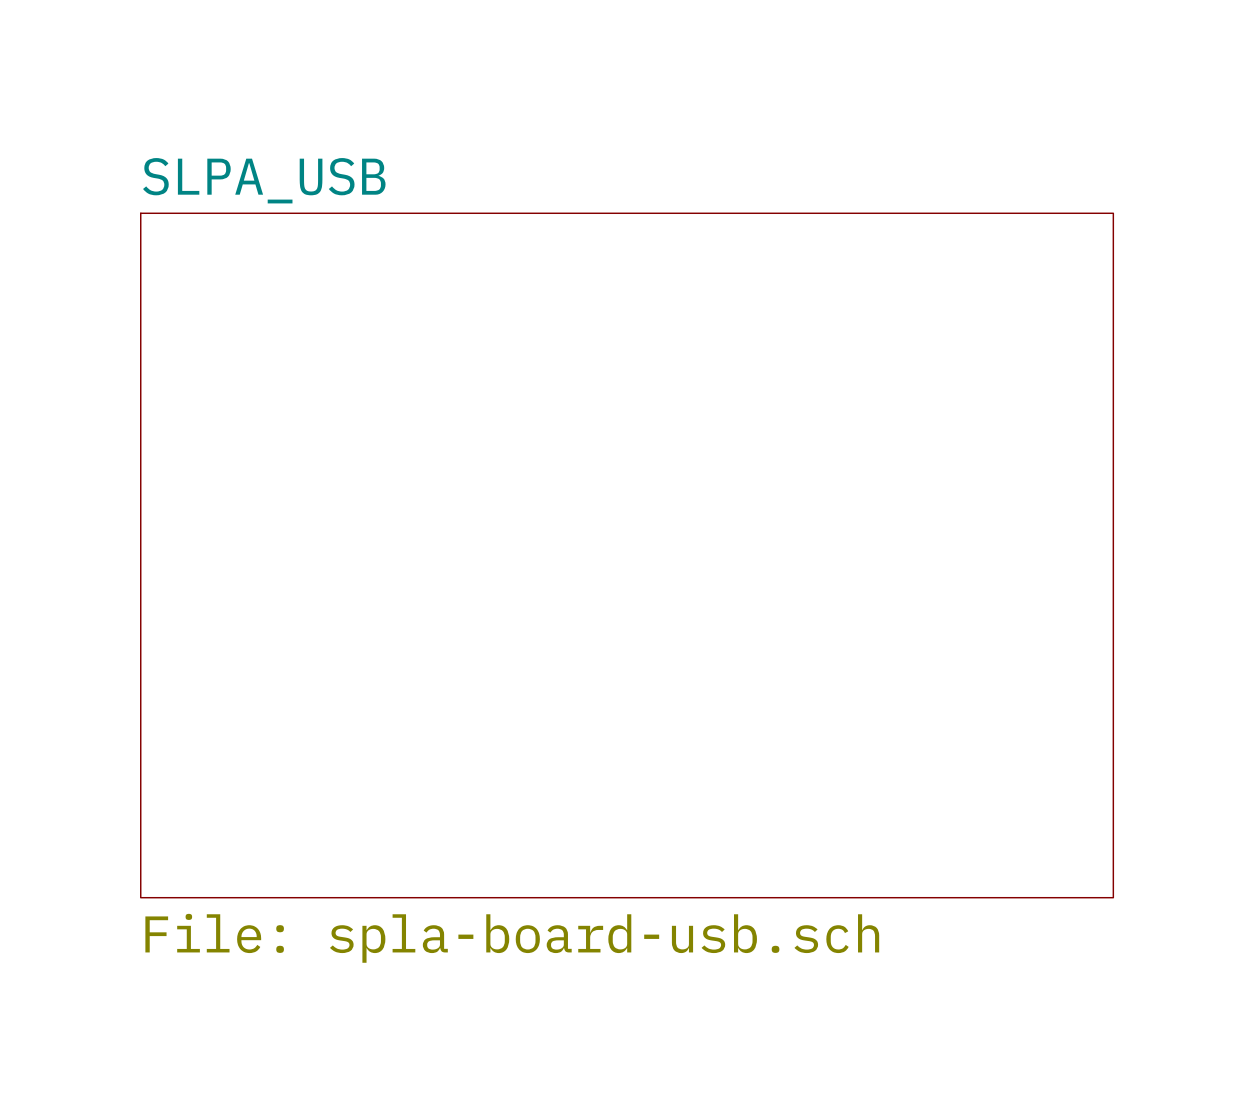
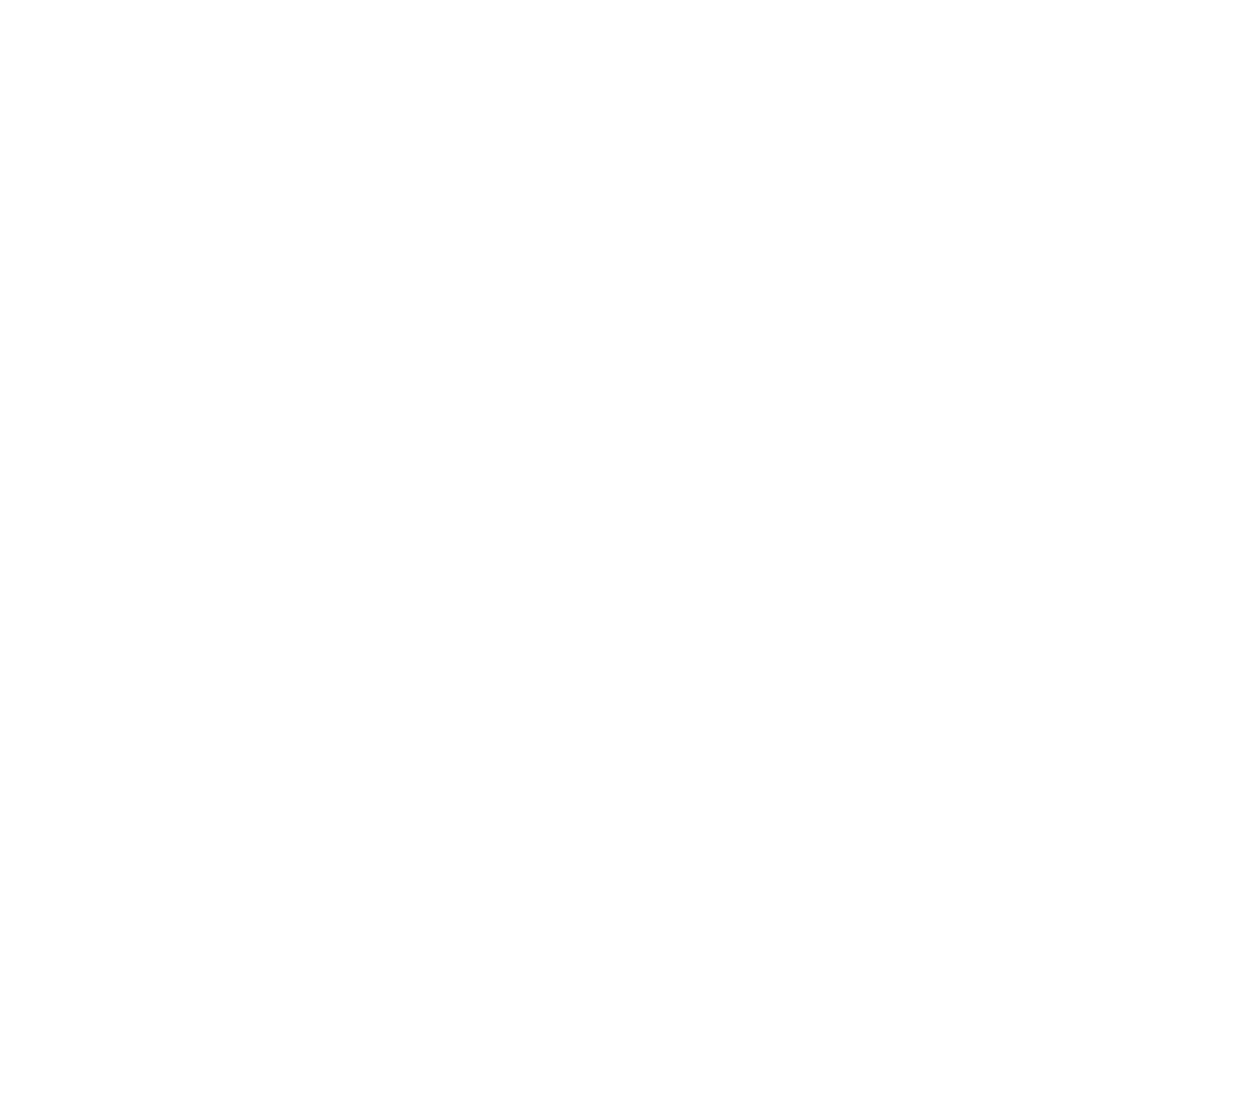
sheet SLPA_USB: File: spla-board-usb.sch (627, 555) -> none

